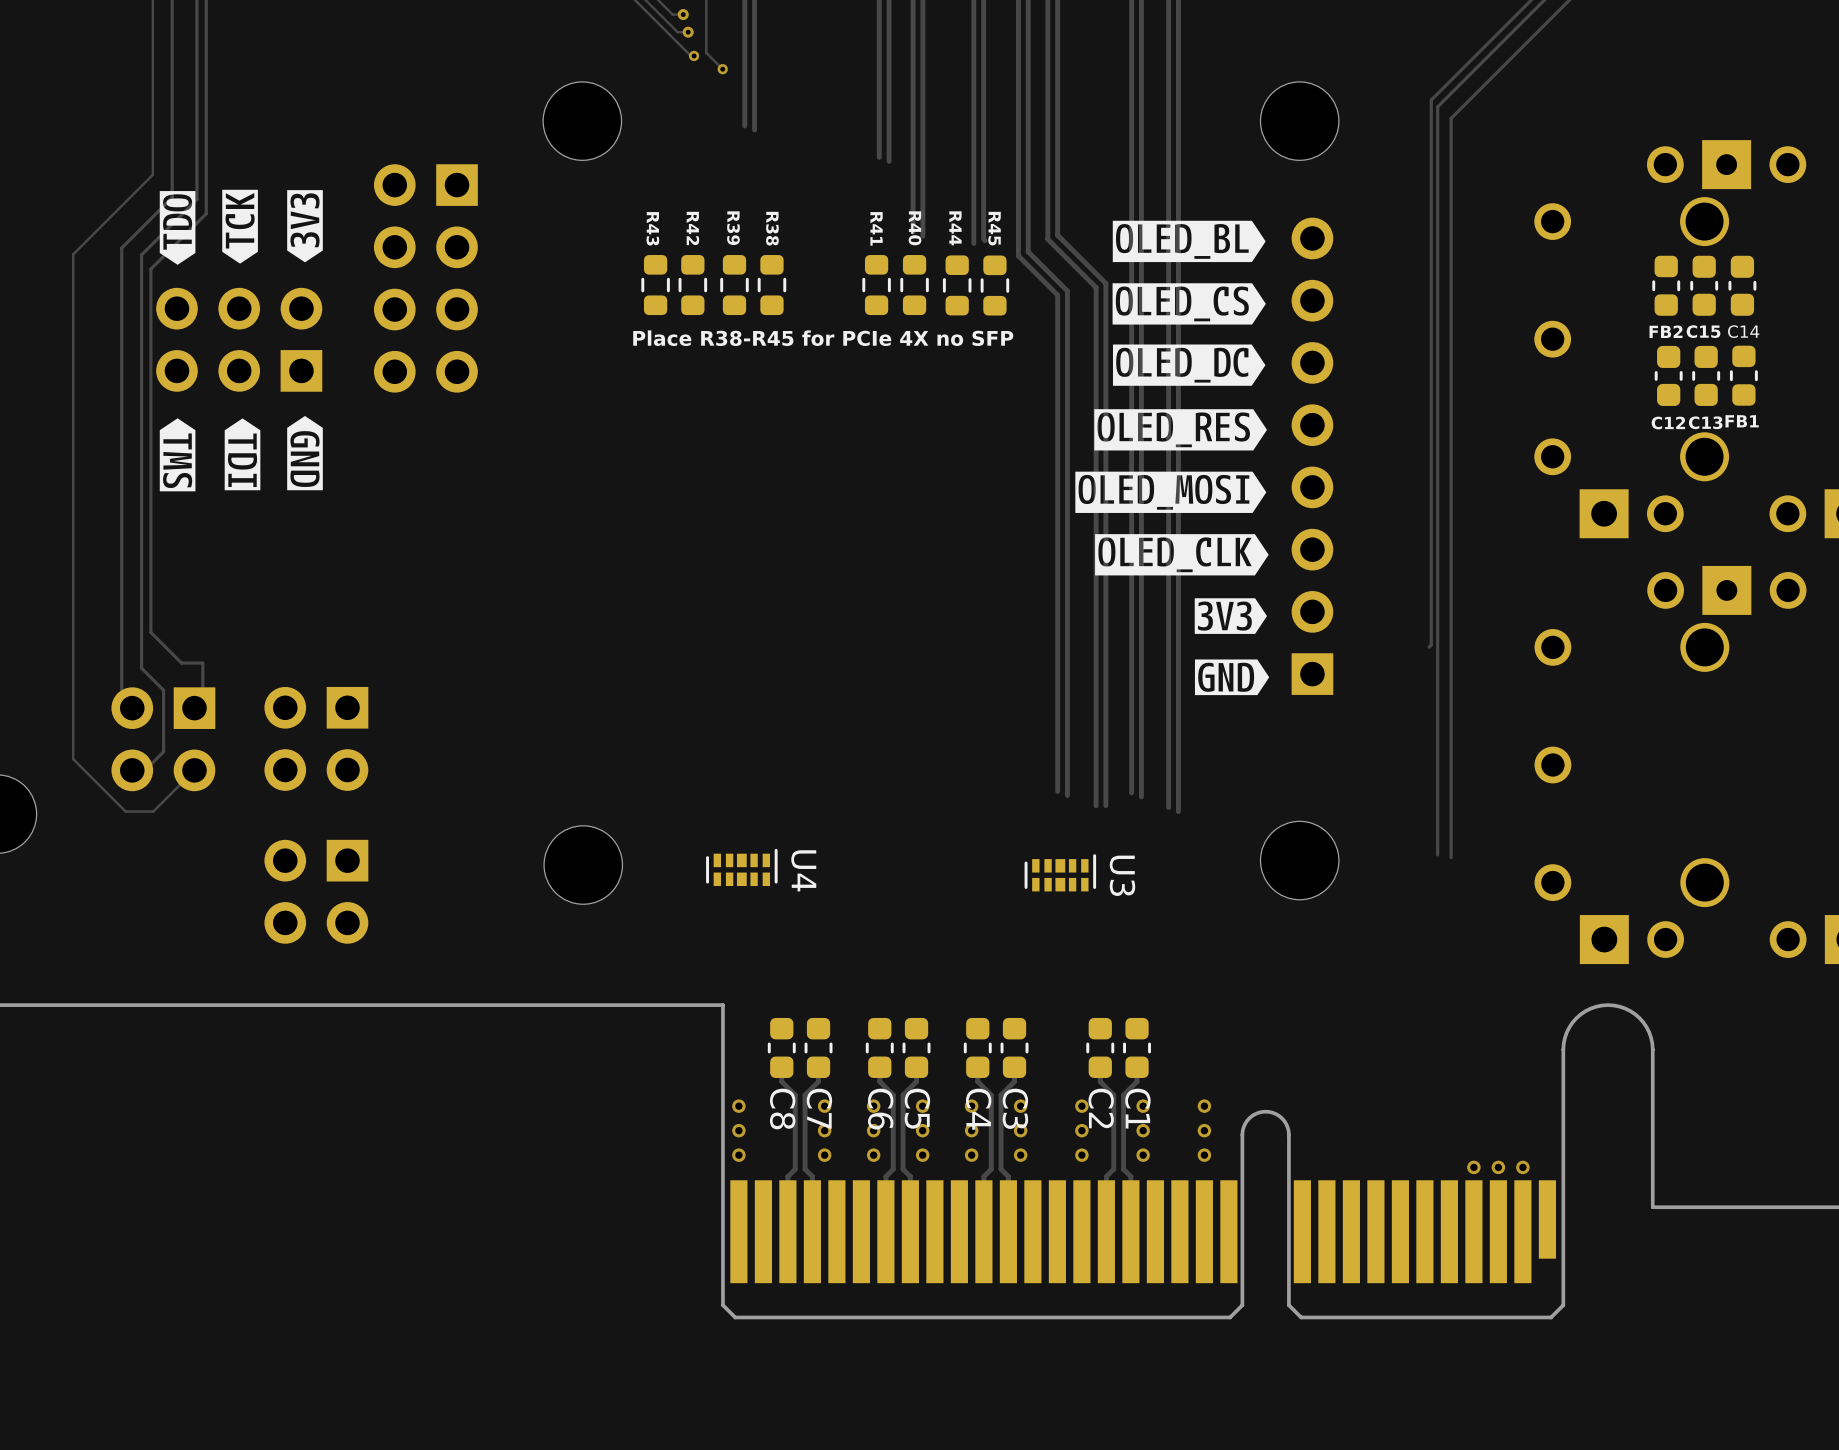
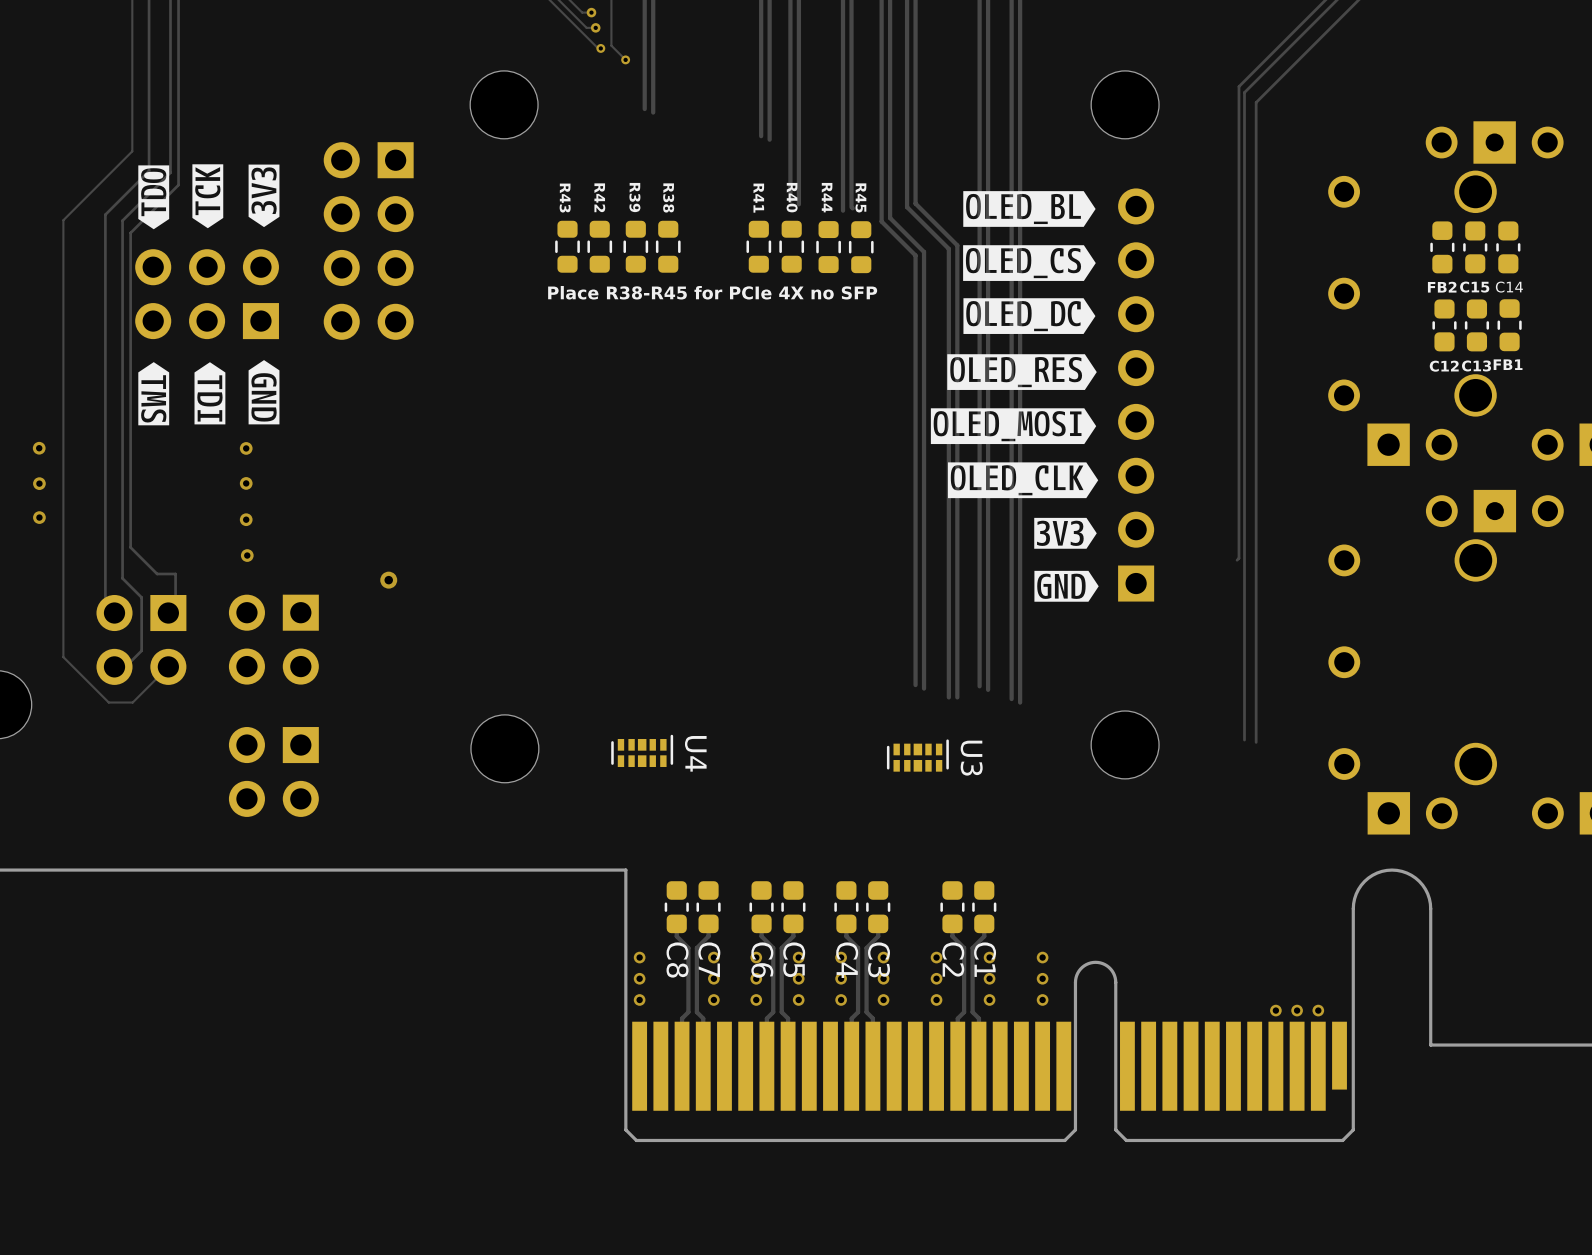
via: none -> (39, 448)
via: none -> (246, 448)
via: none -> (39, 483)
via: none -> (246, 483)
via: none -> (39, 517)
via: none -> (246, 519)
via: none -> (247, 555)
via: none -> (388, 580)

